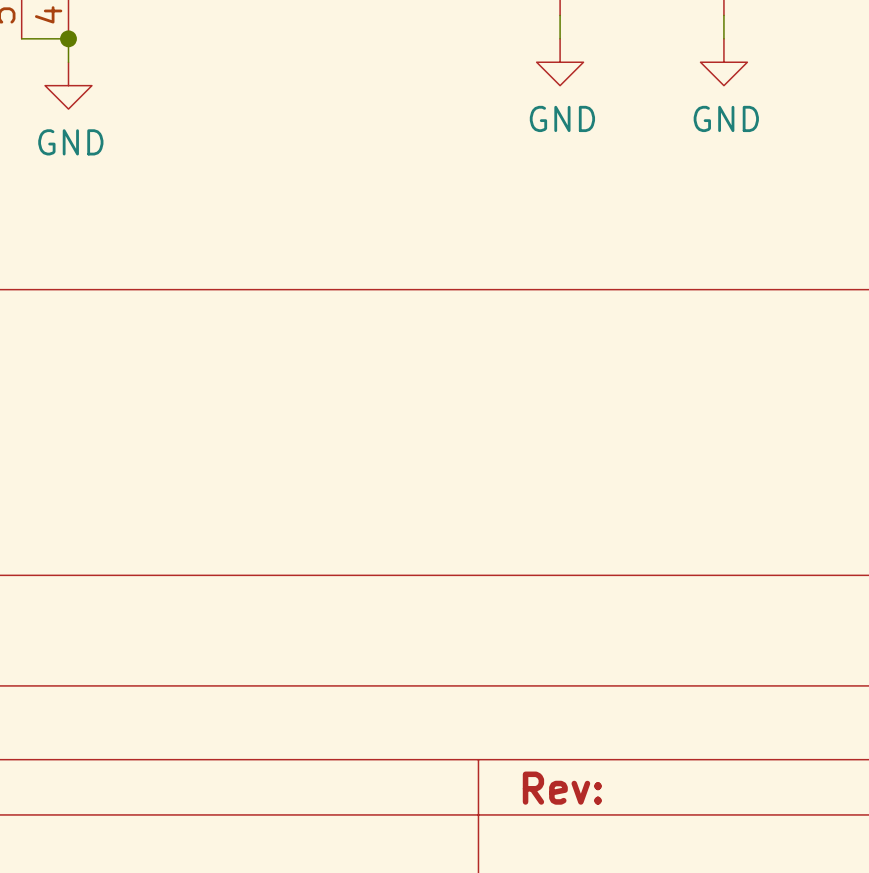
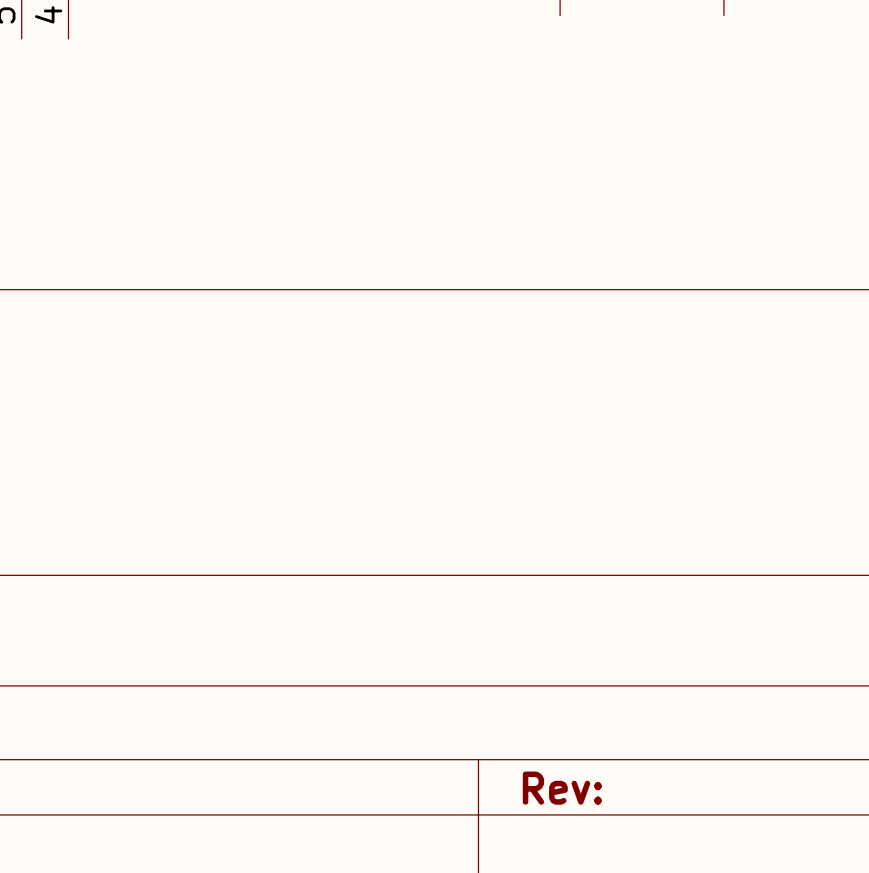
wire: (560, 15) (560, 38) -> none
wire: (723, 15) (723, 38) -> none
wire: (21, 38) (68, 38) (68, 62) -> none
junction: (68, 38) -> none
power symbol: GND (560, 62) -> none
power symbol: GND (723, 62) -> none
power symbol: GND (68, 85) -> none

